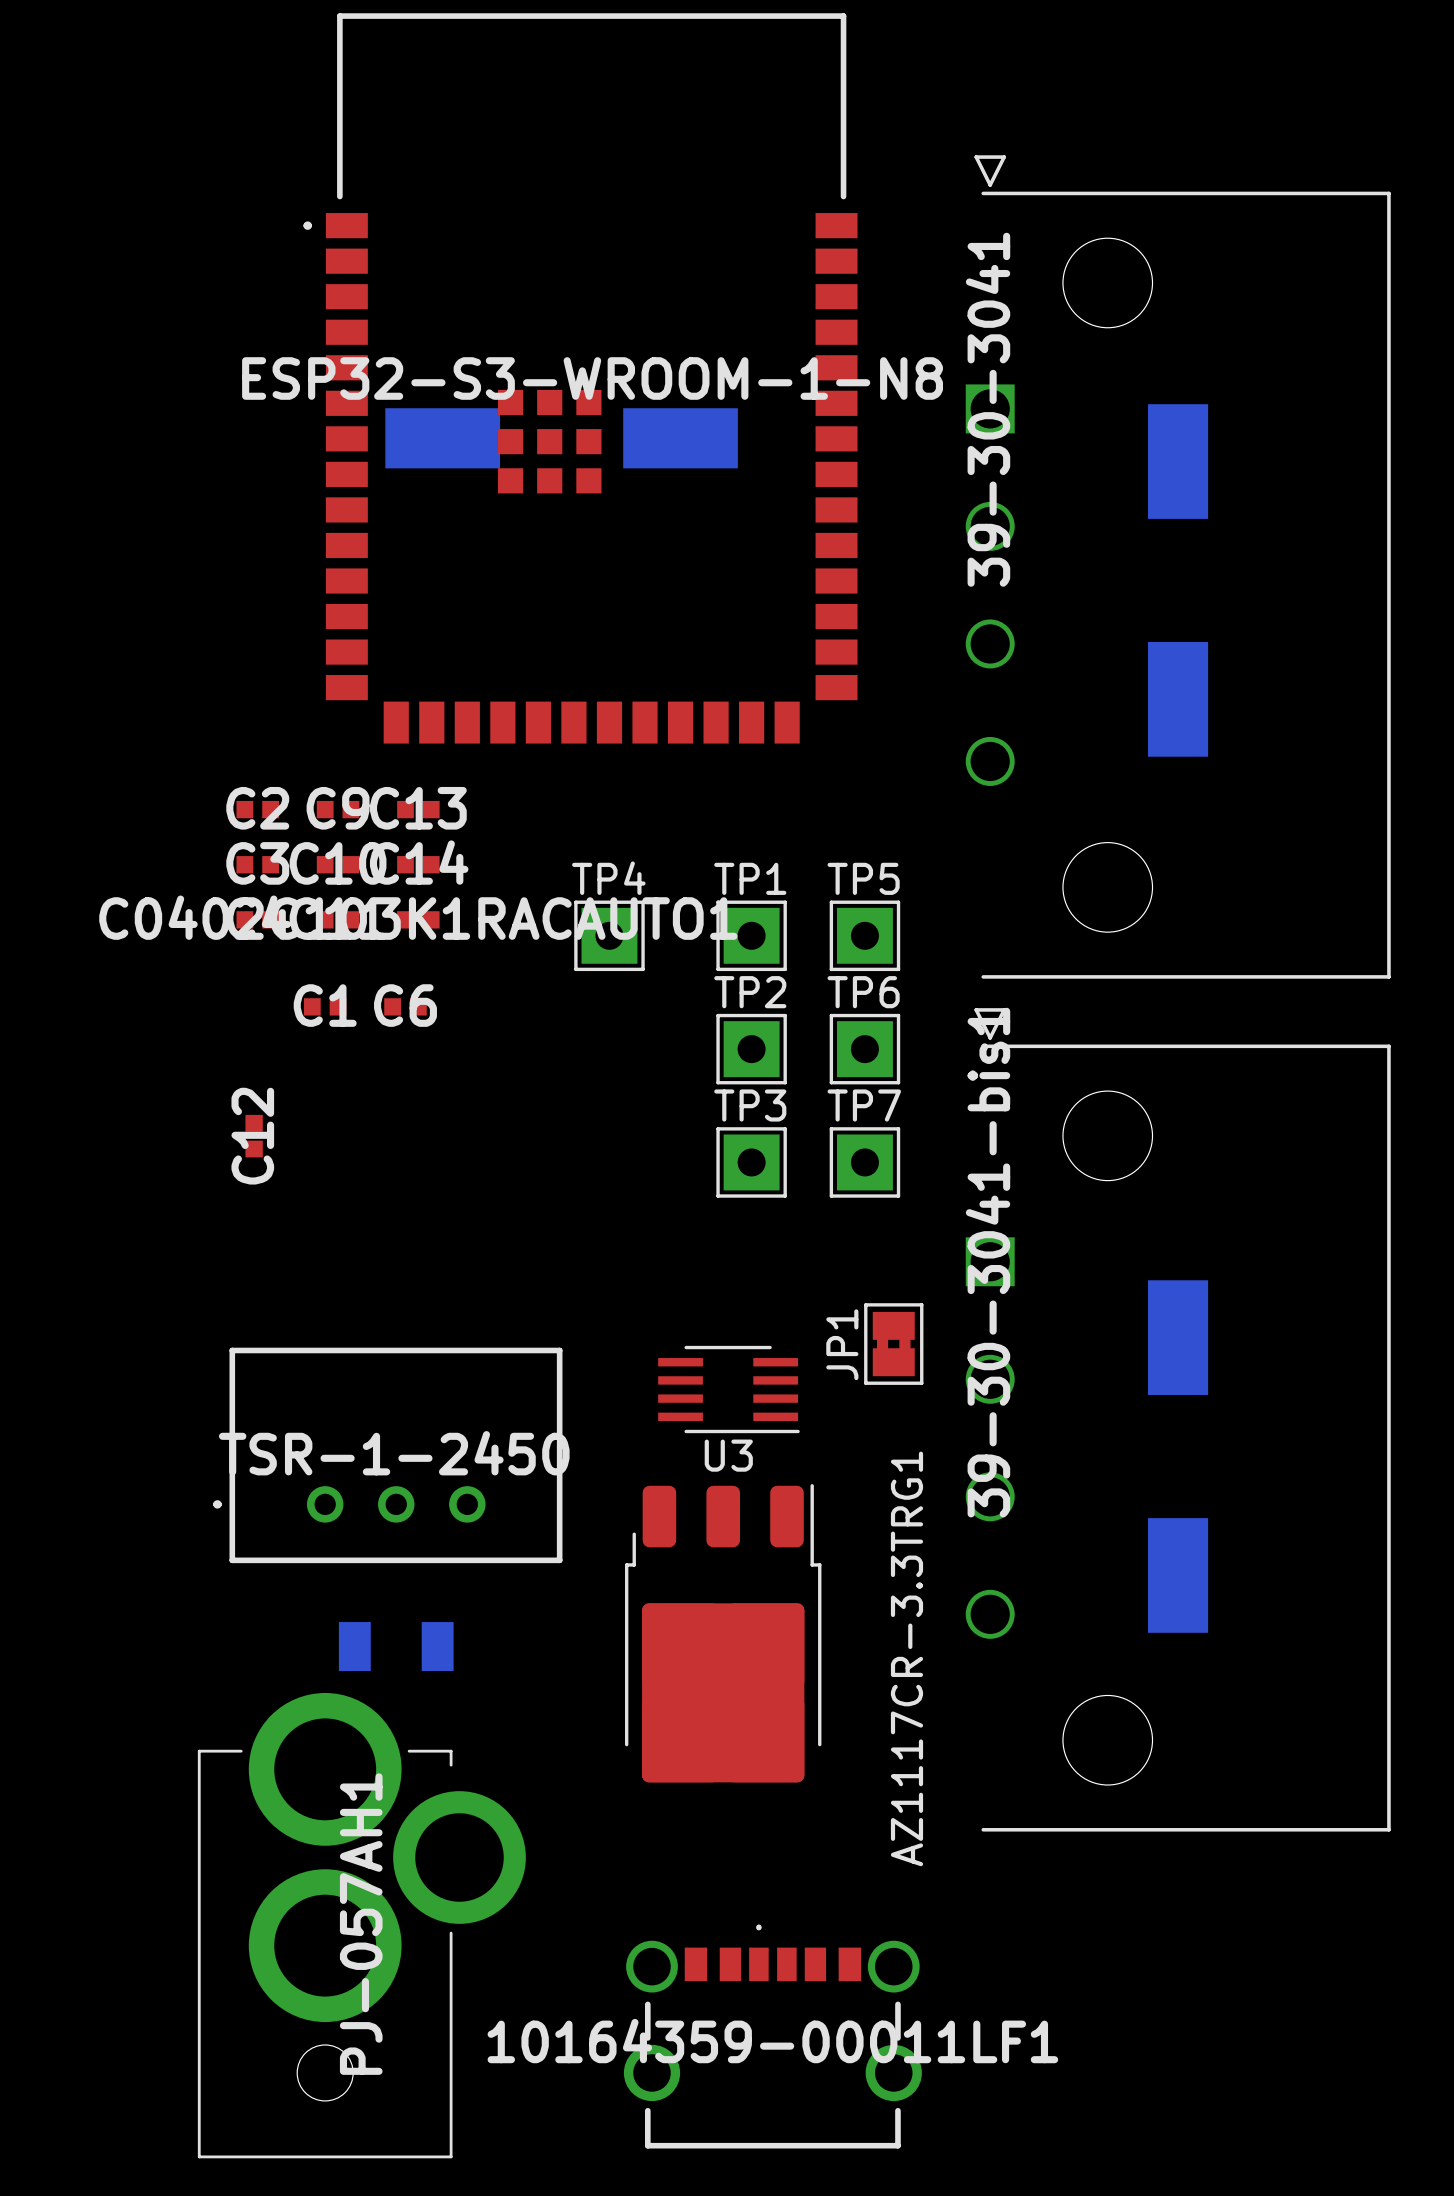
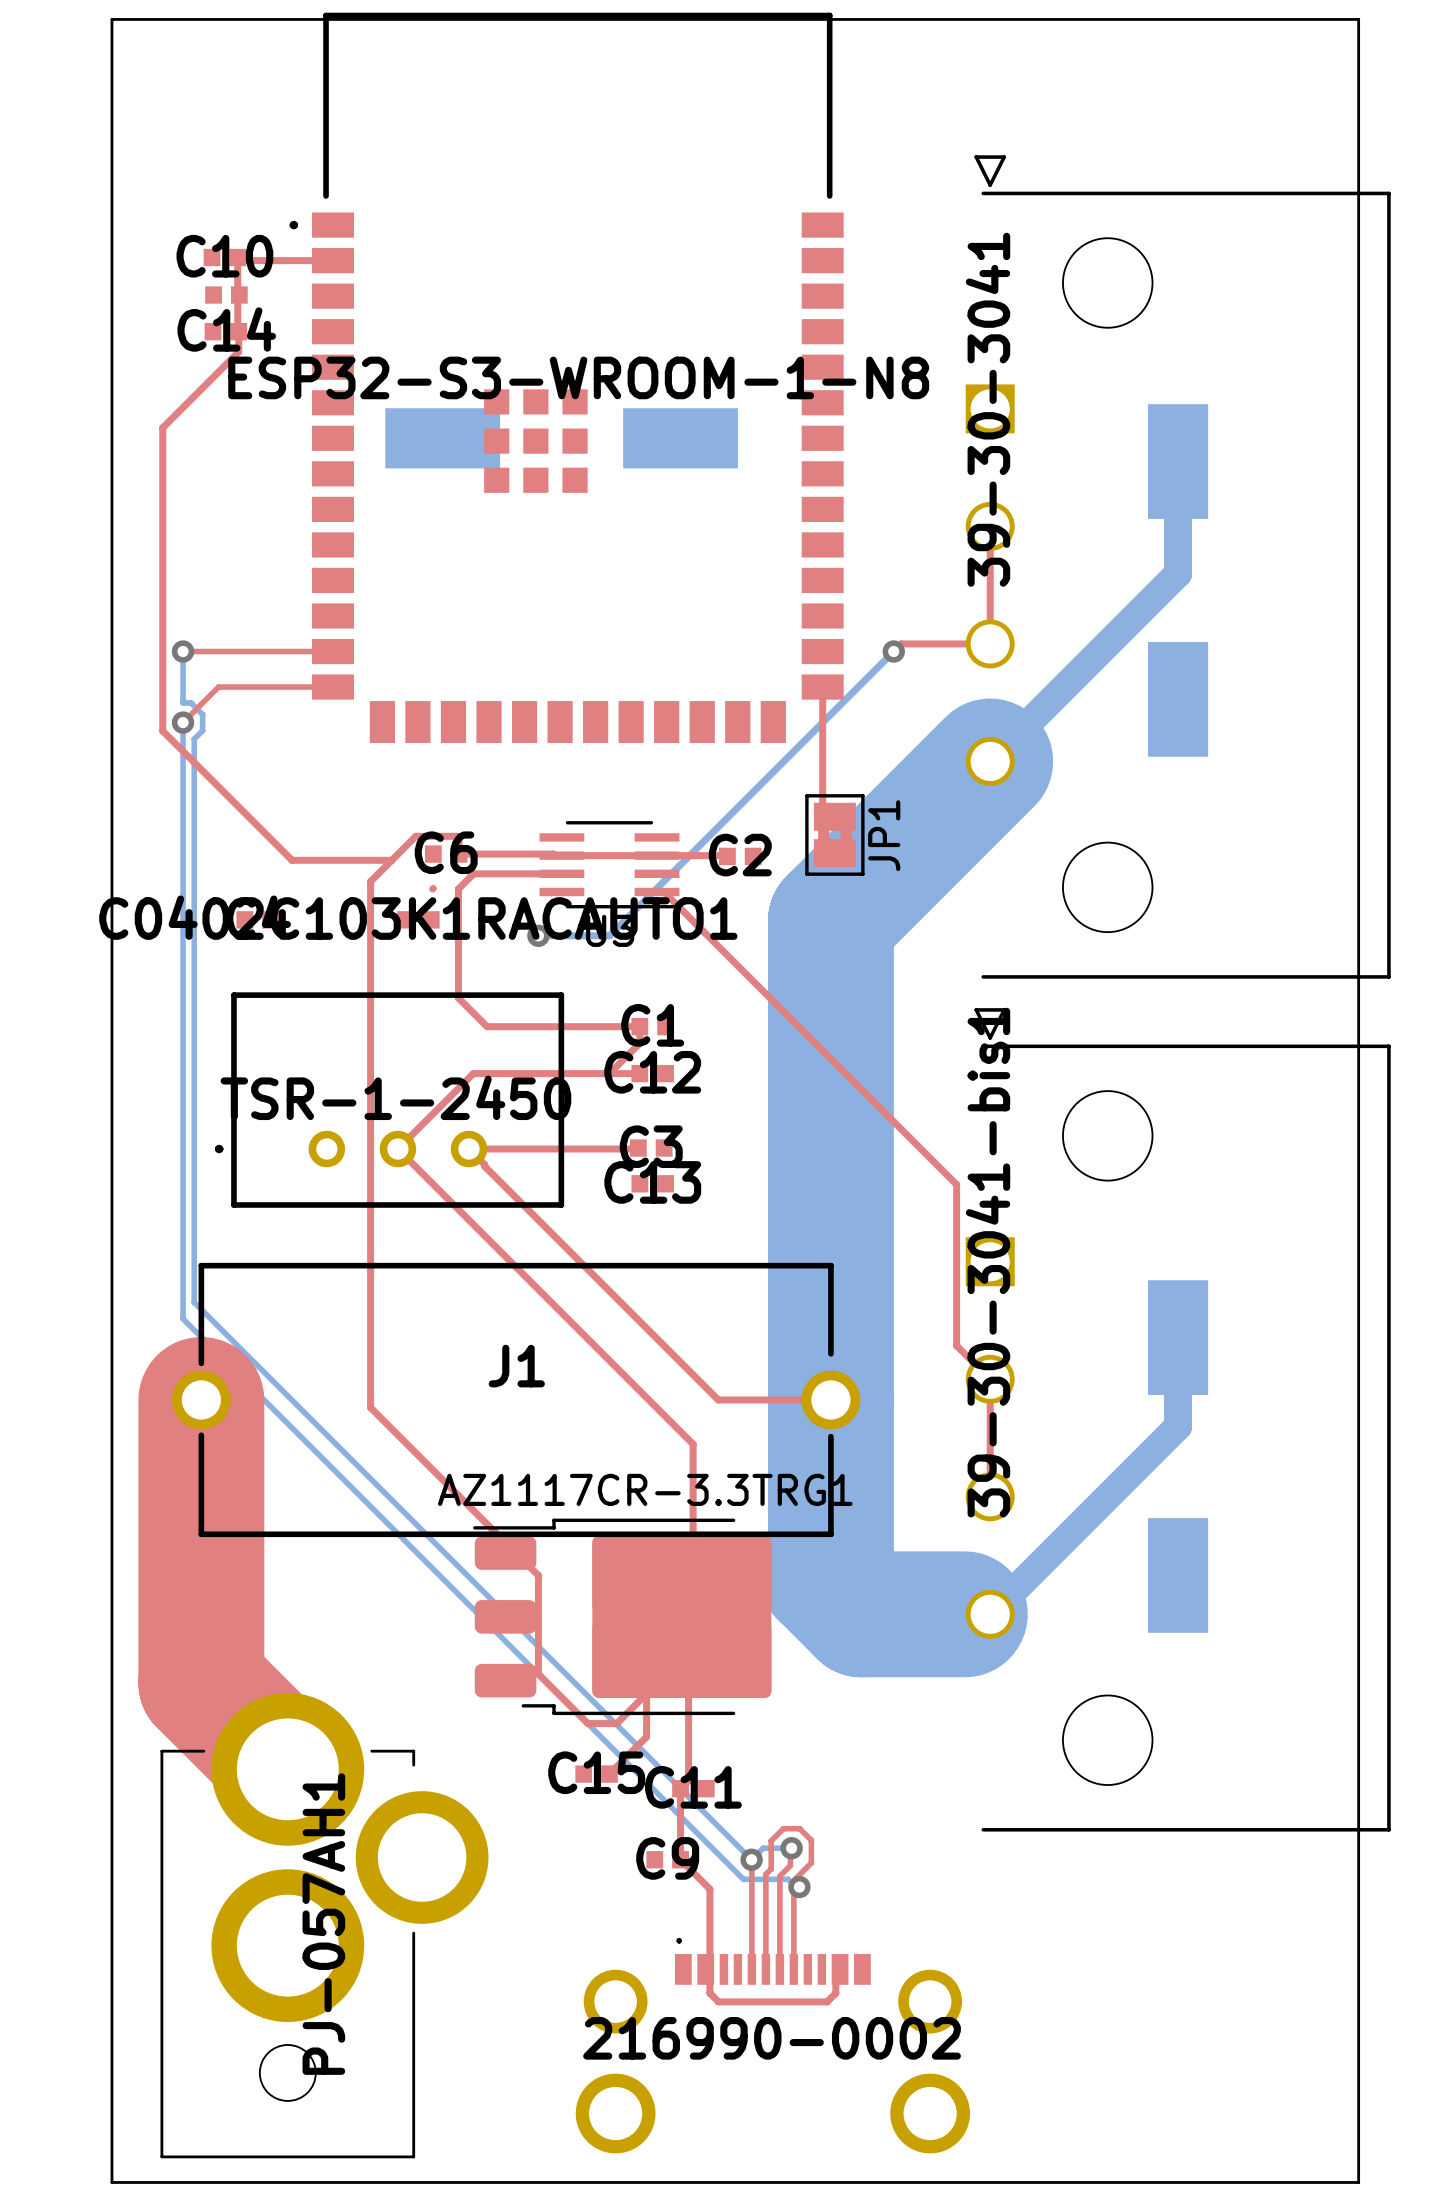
board edge: none -> (111, 19) (1358, 19) (1358, 2182) (111, 2182) (111, 19)
top track: none -> (329, 257) (333, 260) (240, 260) (237, 257) (238, 351) (162, 427) (162, 730) (292, 860) (391, 860)
part: none -> (226, 295)
ESP32-S3-WROOM-1-N8 position: (580, 378) -> (566, 377)
bottom track: none -> (1178, 461) (1178, 573) (830, 920) (830, 1567) (822, 1575) (861, 1614) (964, 1614)
top track: none -> (990, 526) (990, 643) (901, 643) (893, 651)
top track: none -> (183, 651) (333, 651)
bottom track: none -> (183, 651) (183, 703) (191, 703) (202, 714) (202, 730) (194, 739) (194, 1302) (751, 1859) (763, 1848) (791, 1848)
via: none -> (183, 651)
bottom track: none -> (893, 651) (609, 935) (538, 935)
via: none -> (893, 651)
top track: none -> (333, 687) (218, 687) (183, 722)
top track: none -> (822, 687) (822, 815) (821, 816)
bottom track: none -> (183, 722) (183, 1318) (743, 1879) (788, 1879) (795, 1887) (799, 1887)
via: none -> (183, 722)
C2 position: (257, 809) -> (740, 856)
C9 position: (338, 809) -> (667, 1859)
C13 position: (418, 809) -> (652, 1183)
top track: none -> (727, 856) (459, 854) (459, 838) (456, 836) (415, 836) (370, 881) (370, 1407) (538, 1575) (538, 1674) (587, 1723) (616, 1723) (646, 1693) (646, 1736) (609, 1774)
C3 position: (257, 864) -> (651, 1148)
C10 position: (338, 864) -> (224, 257)
C14 position: (418, 864) -> (225, 331)
top track: none -> (554, 873) (473, 873) (458, 889) (458, 997) (487, 1026) (639, 1026) (639, 1043) (609, 1073)
top track: none -> (433, 888) (432, 889)
top track: none -> (664, 892) (956, 1184) (956, 1345) (990, 1379) (990, 1496)
C11 position: (338, 919) -> (693, 1788)
via: none -> (538, 935)
TP4: (609, 935) -> none
TP1: (751, 935) -> none
TP5: (864, 935) -> none
C1 position: (325, 1006) -> (652, 1026)
C6 position: (405, 1006) -> (446, 854)
TP2: (751, 1049) -> none
TP6: (864, 1049) -> none
top track: none -> (639, 1073) (473, 1073) (397, 1149) (693, 1444) (693, 1691) (688, 1696) (688, 1780) (680, 1788) (680, 1859) (709, 1889) (709, 1993) (718, 2001) (827, 2001) (835, 1993) (835, 1969)
C12 rotation: 0° (254, 1136) -> 90° clockwise (652, 1073)
C12 position: (254, 1136) -> (652, 1073)
top track: none -> (638, 1148) (469, 1149) (718, 1399) (830, 1399)
TP3: (751, 1162) -> none
TP7: (864, 1162) -> none
bottom track: none -> (1178, 1337) (1178, 1426) (990, 1614)
JP1 name position: JP1 (842, 1344) -> JP1 (884, 835)
JP1 position: (893, 1344) -> (834, 834)
U3 position: (728, 1389) -> (610, 864)
top track: none -> (201, 1399) (201, 1682) (287, 1769) (305, 1769) (325, 1788)
J1: none -> (516, 1399)
TSR-1-2450 position: (387, 1455) -> (389, 1100)
AZ1117CR-3.3TRG1 rotation: 0° (723, 1633) -> 90° counterclockwise (622, 1616)
part: (396, 1646) -> none
AZ1117CR-3.3TRG1 name position: AZ1117CR-3.3TRG1 (906, 1658) -> AZ1117CR-3.3TRG1 (645, 1489)
C15: none -> (596, 1774)
top track: none -> (791, 1848) (790, 1865) (779, 1876) (779, 1969)
via: none -> (791, 1848)
via: none -> (751, 1859)
top track: none -> (751, 1860) (751, 1969)
via: none -> (799, 1887)
PJ-057AH1 position: (361, 1925) -> (324, 1925)
top track: none -> (765, 1969) (765, 1874) (771, 1868) (771, 1840) (783, 1828) (799, 1828) (811, 1840) (811, 1862) (792, 1881) (793, 1969)
10164359-00011LF1: (772, 2036) -> none
216990-0002: none -> (772, 2045)

